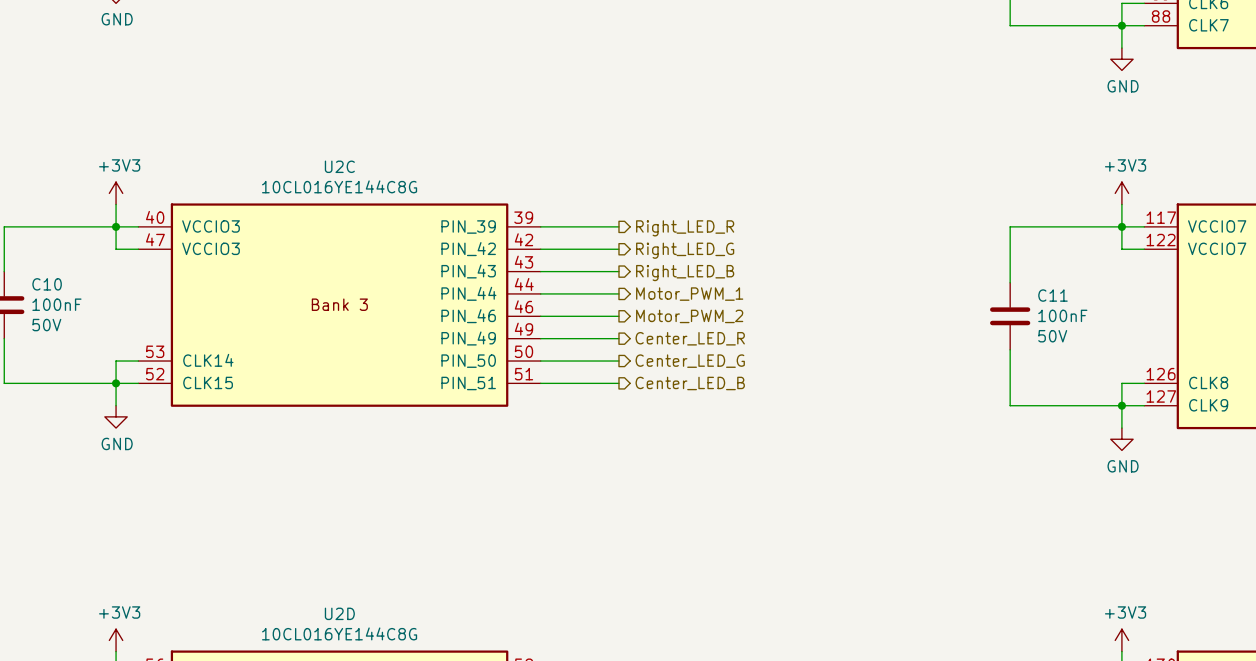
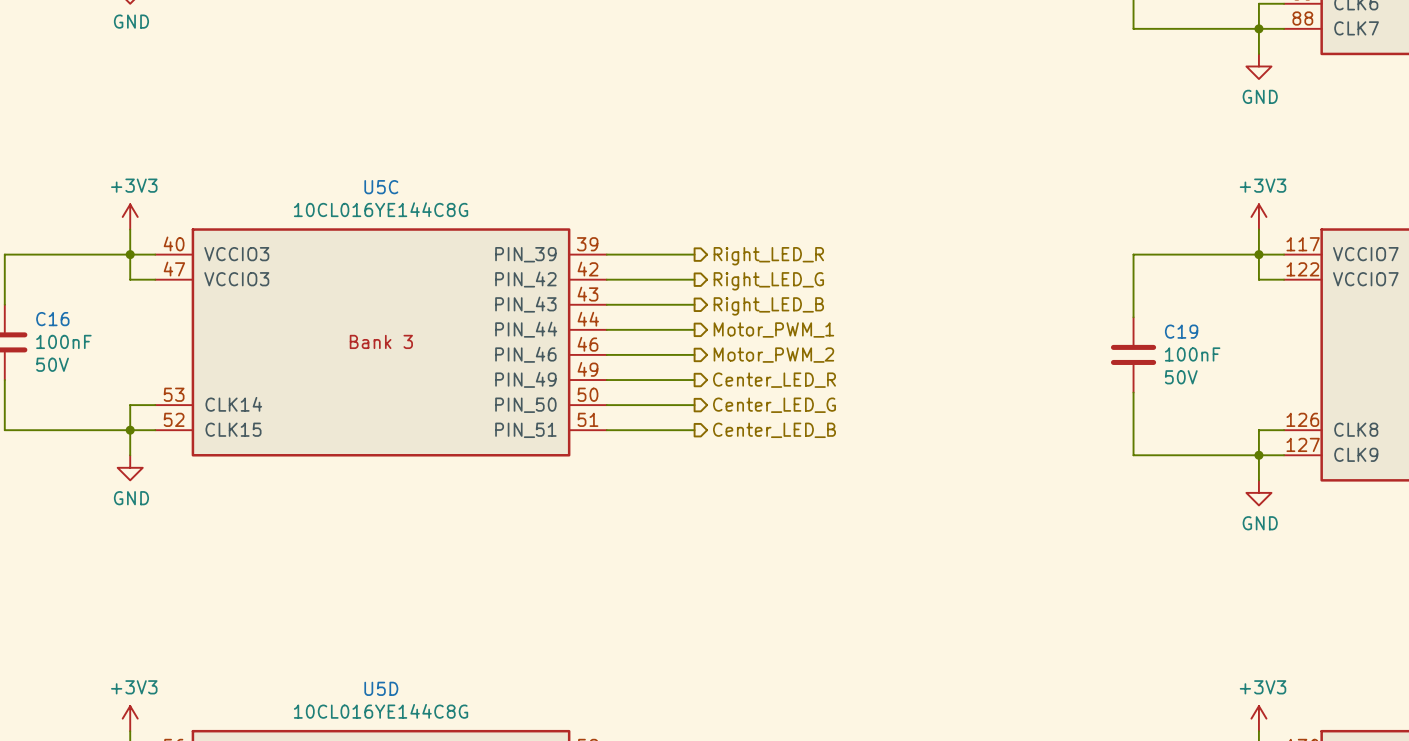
U2C name: U2C (339, 166) -> U5C (381, 187)
C10 name: C10 (47, 284) -> C16 (52, 319)
C11 name: C11 (1052, 295) -> C19 (1181, 331)
U2D name: U2D (339, 613) -> U5D (381, 688)

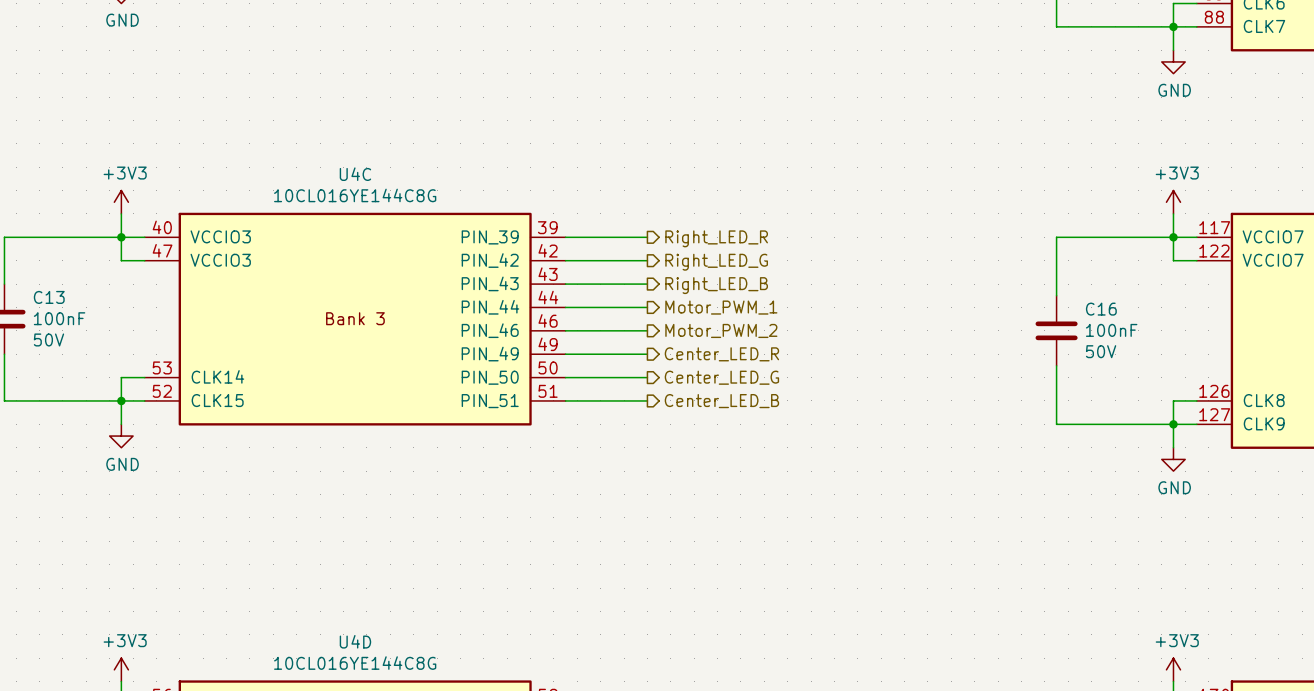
U5C name: U5C (381, 187) -> U4C (355, 174)
C16 name: C16 (52, 319) -> C13 (49, 297)
C19 name: C19 (1181, 331) -> C16 (1101, 309)
U5D name: U5D (381, 688) -> U4D (355, 641)

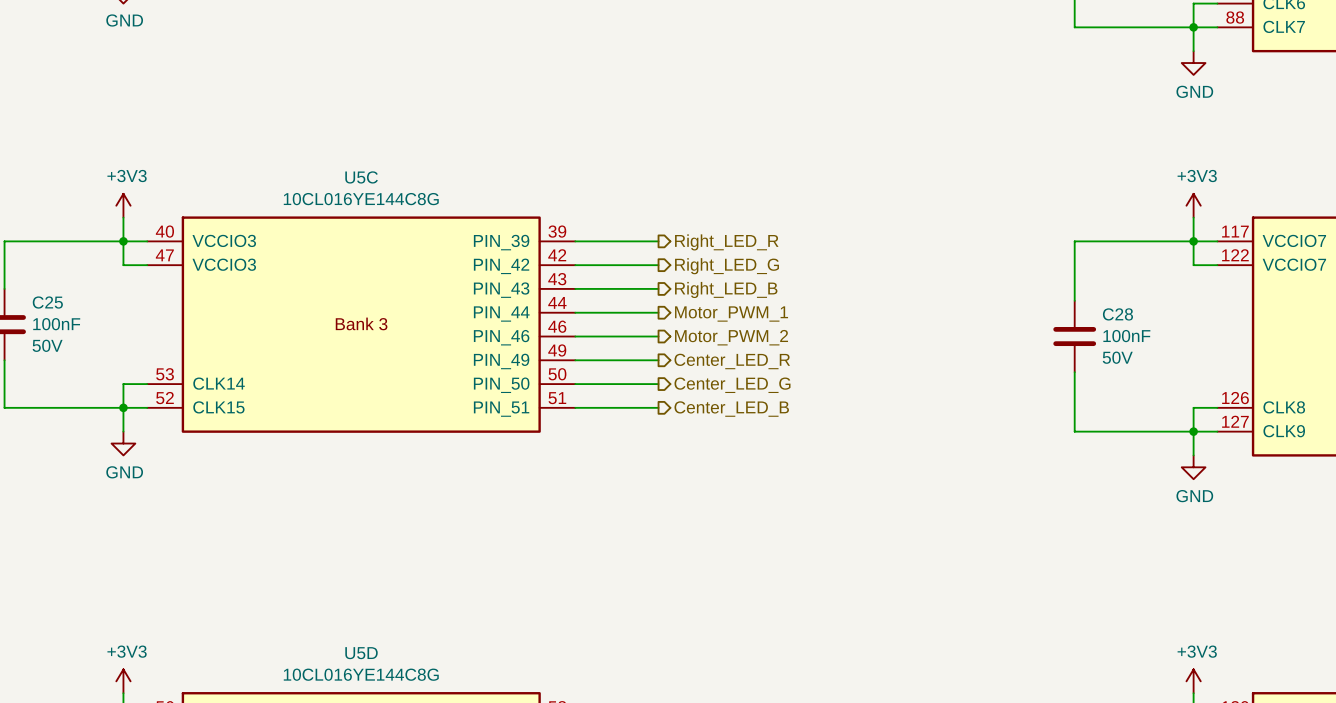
U4C name: U4C (355, 174) -> U5C (361, 177)
C13 name: C13 (49, 297) -> C25 (47, 302)
C16 name: C16 (1101, 309) -> C28 (1117, 314)
U4D name: U4D (355, 641) -> U5D (361, 653)

